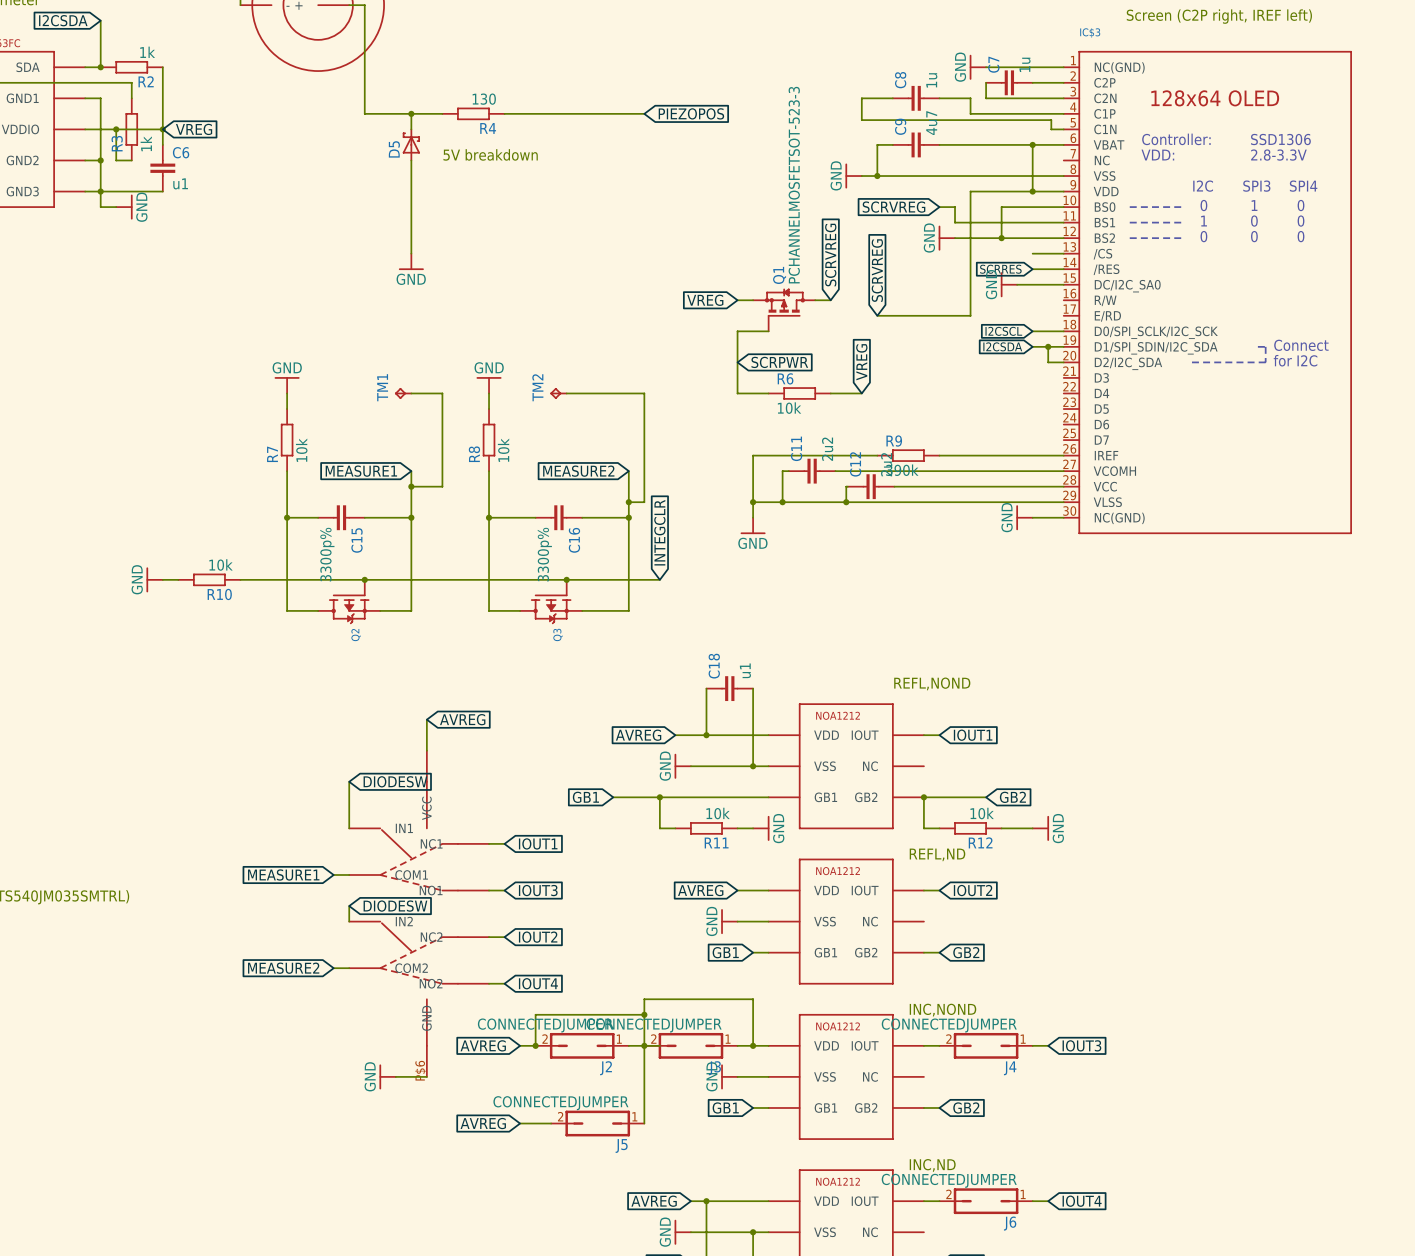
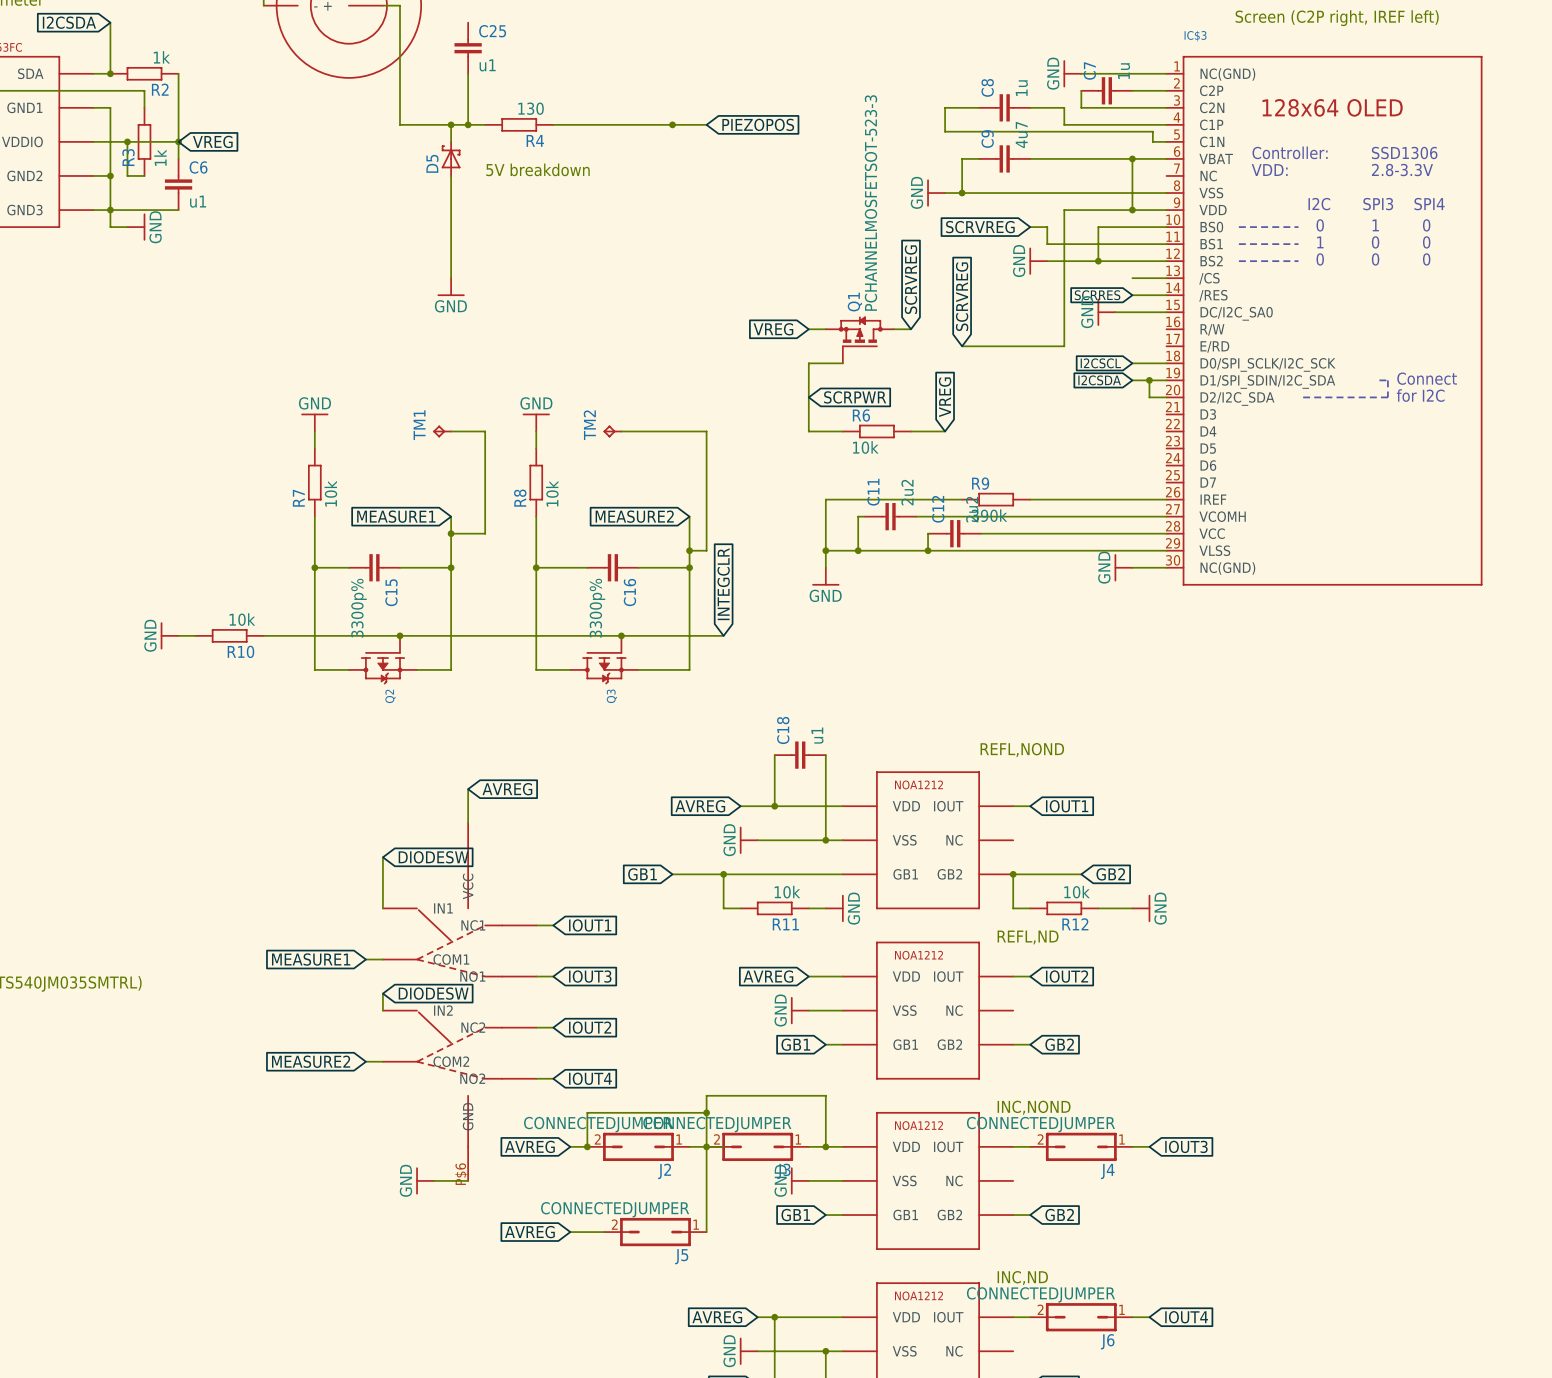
C25: none -> u1 (468, 48)
wire: none -> (468, 73) (468, 124)
junction: none -> (468, 124)
junction: none -> (672, 124)

